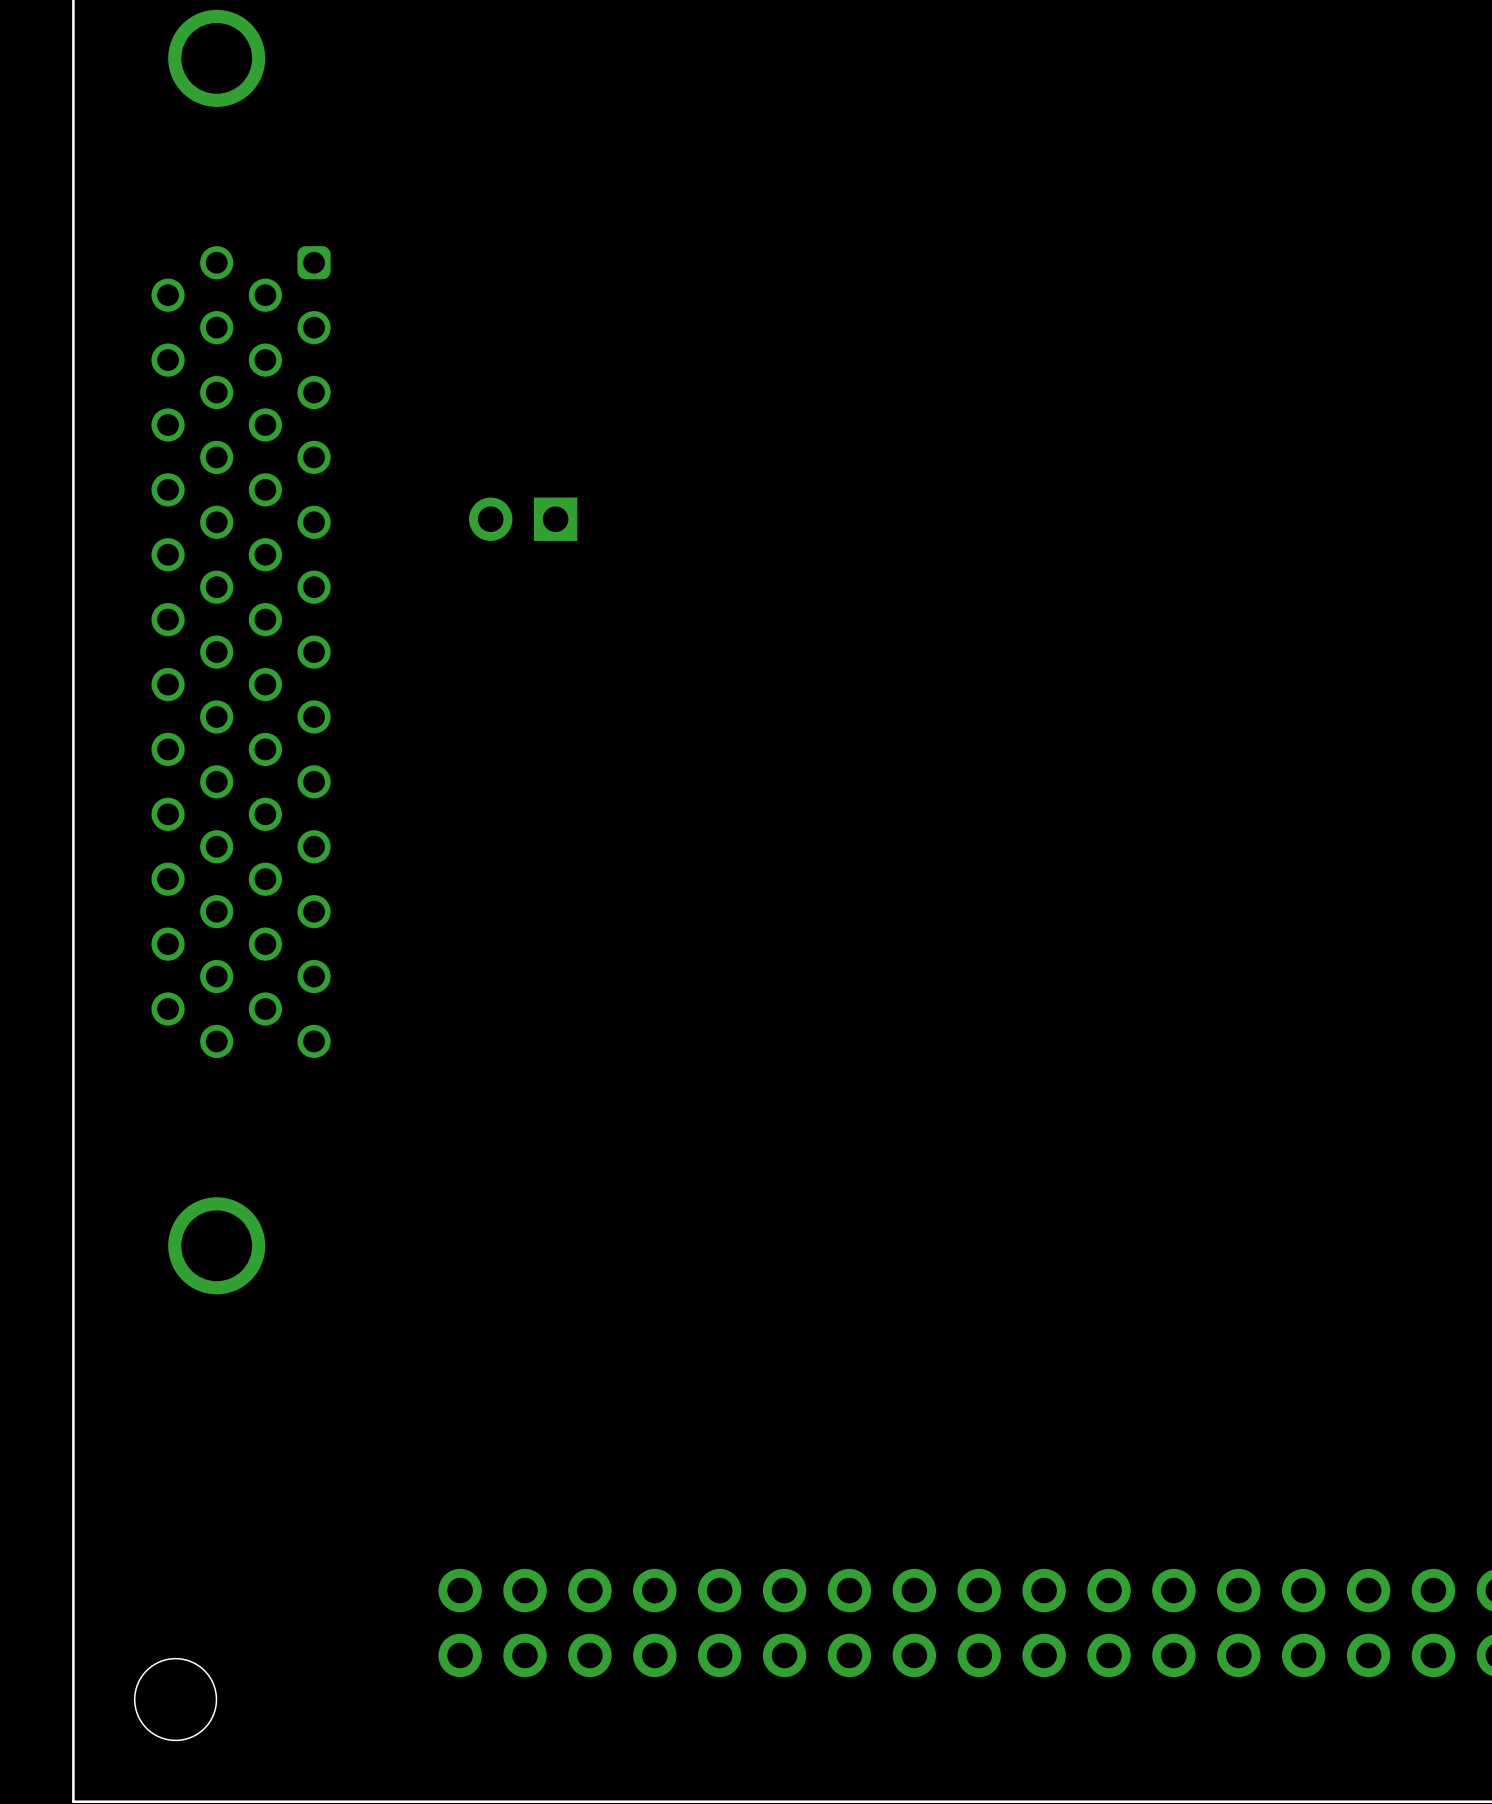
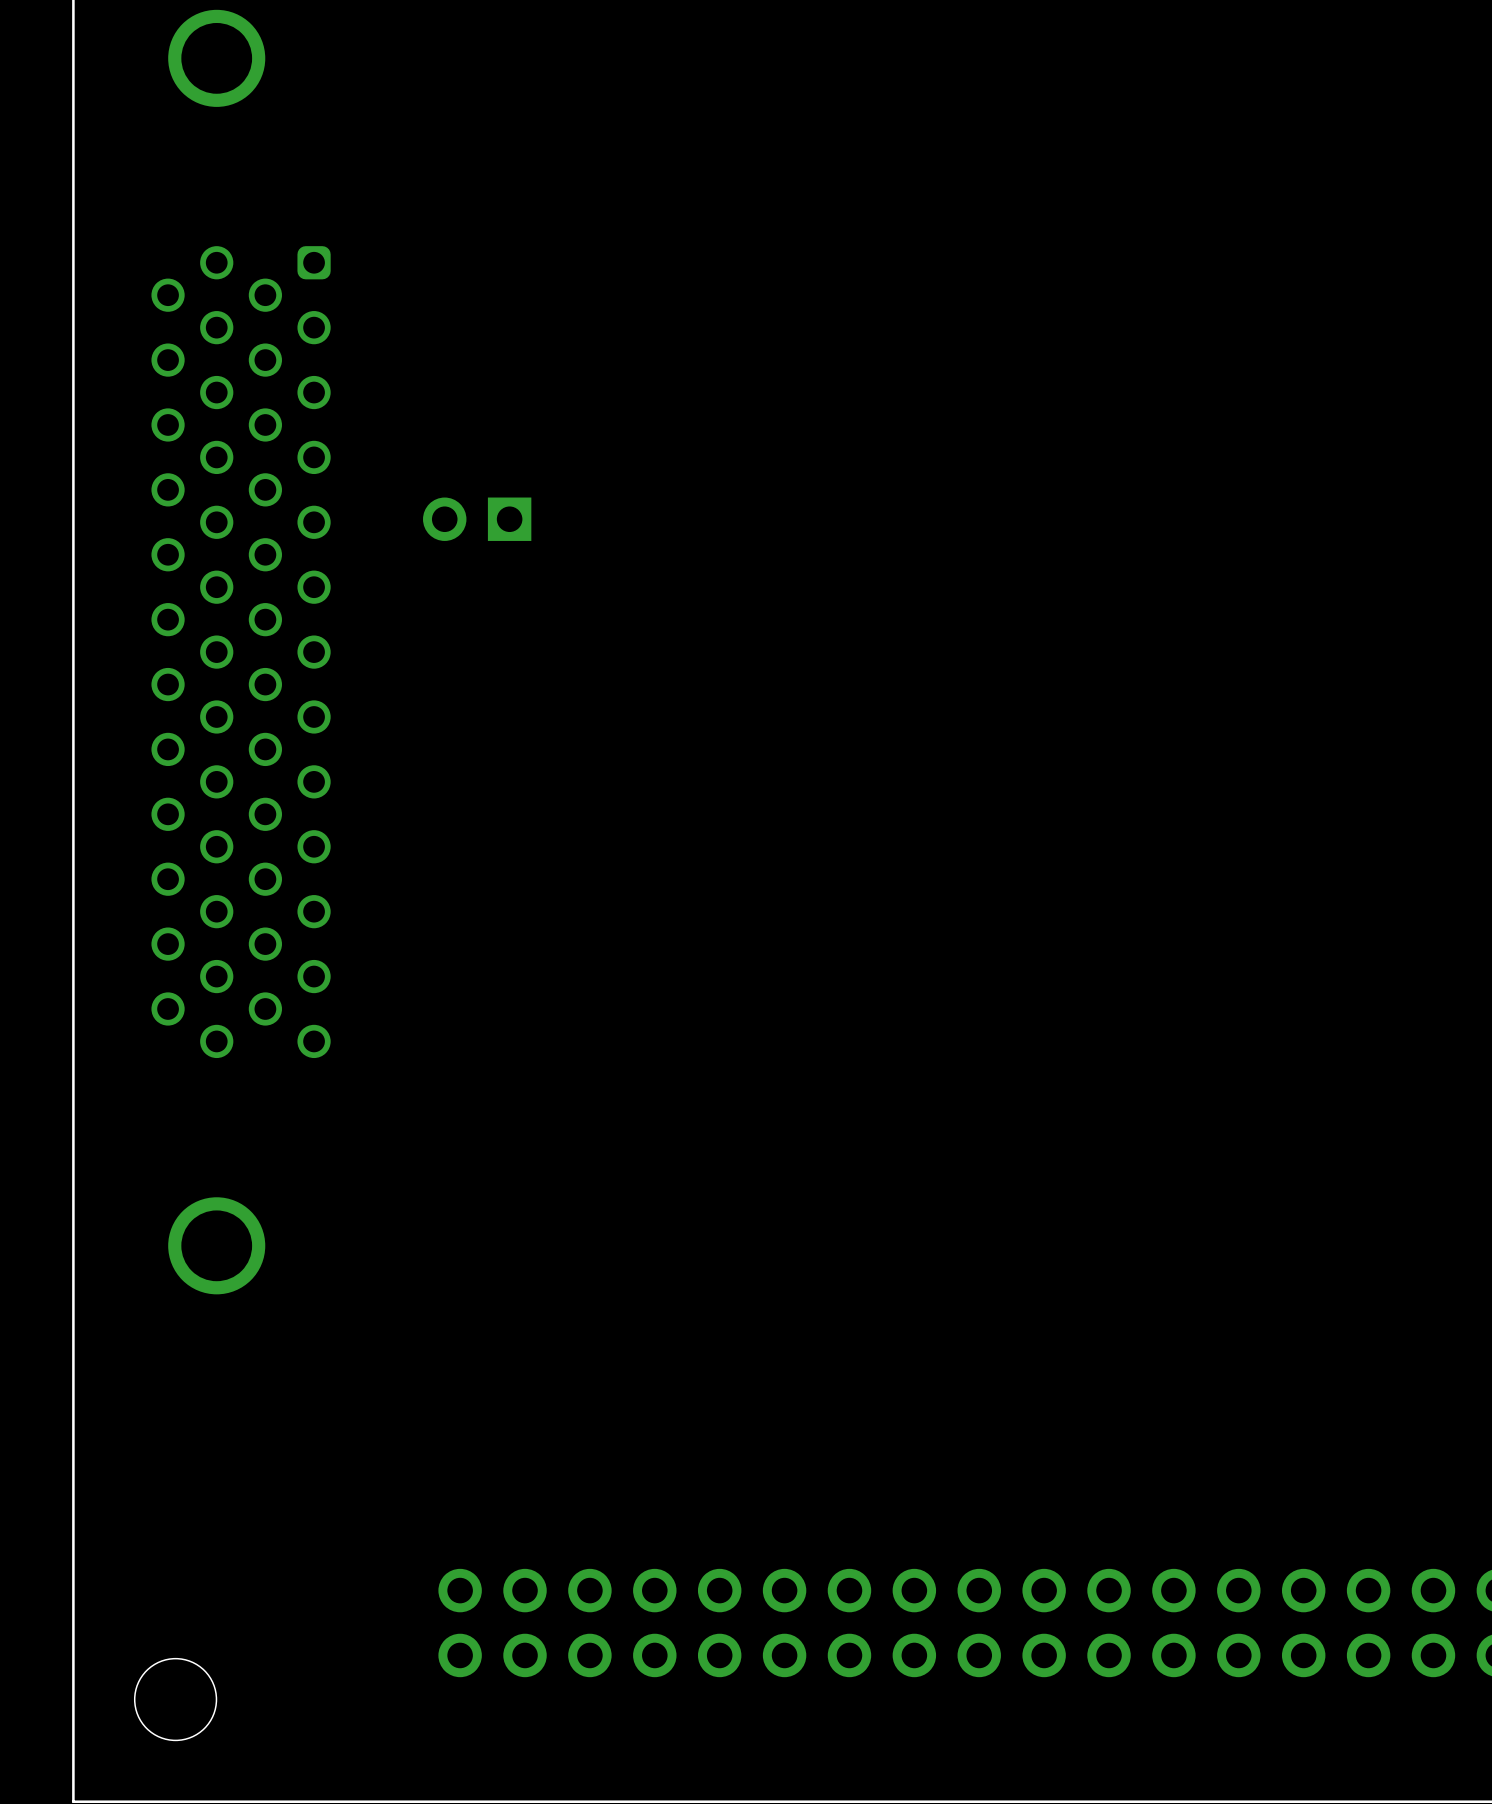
part position: (523, 519) -> (477, 519)

